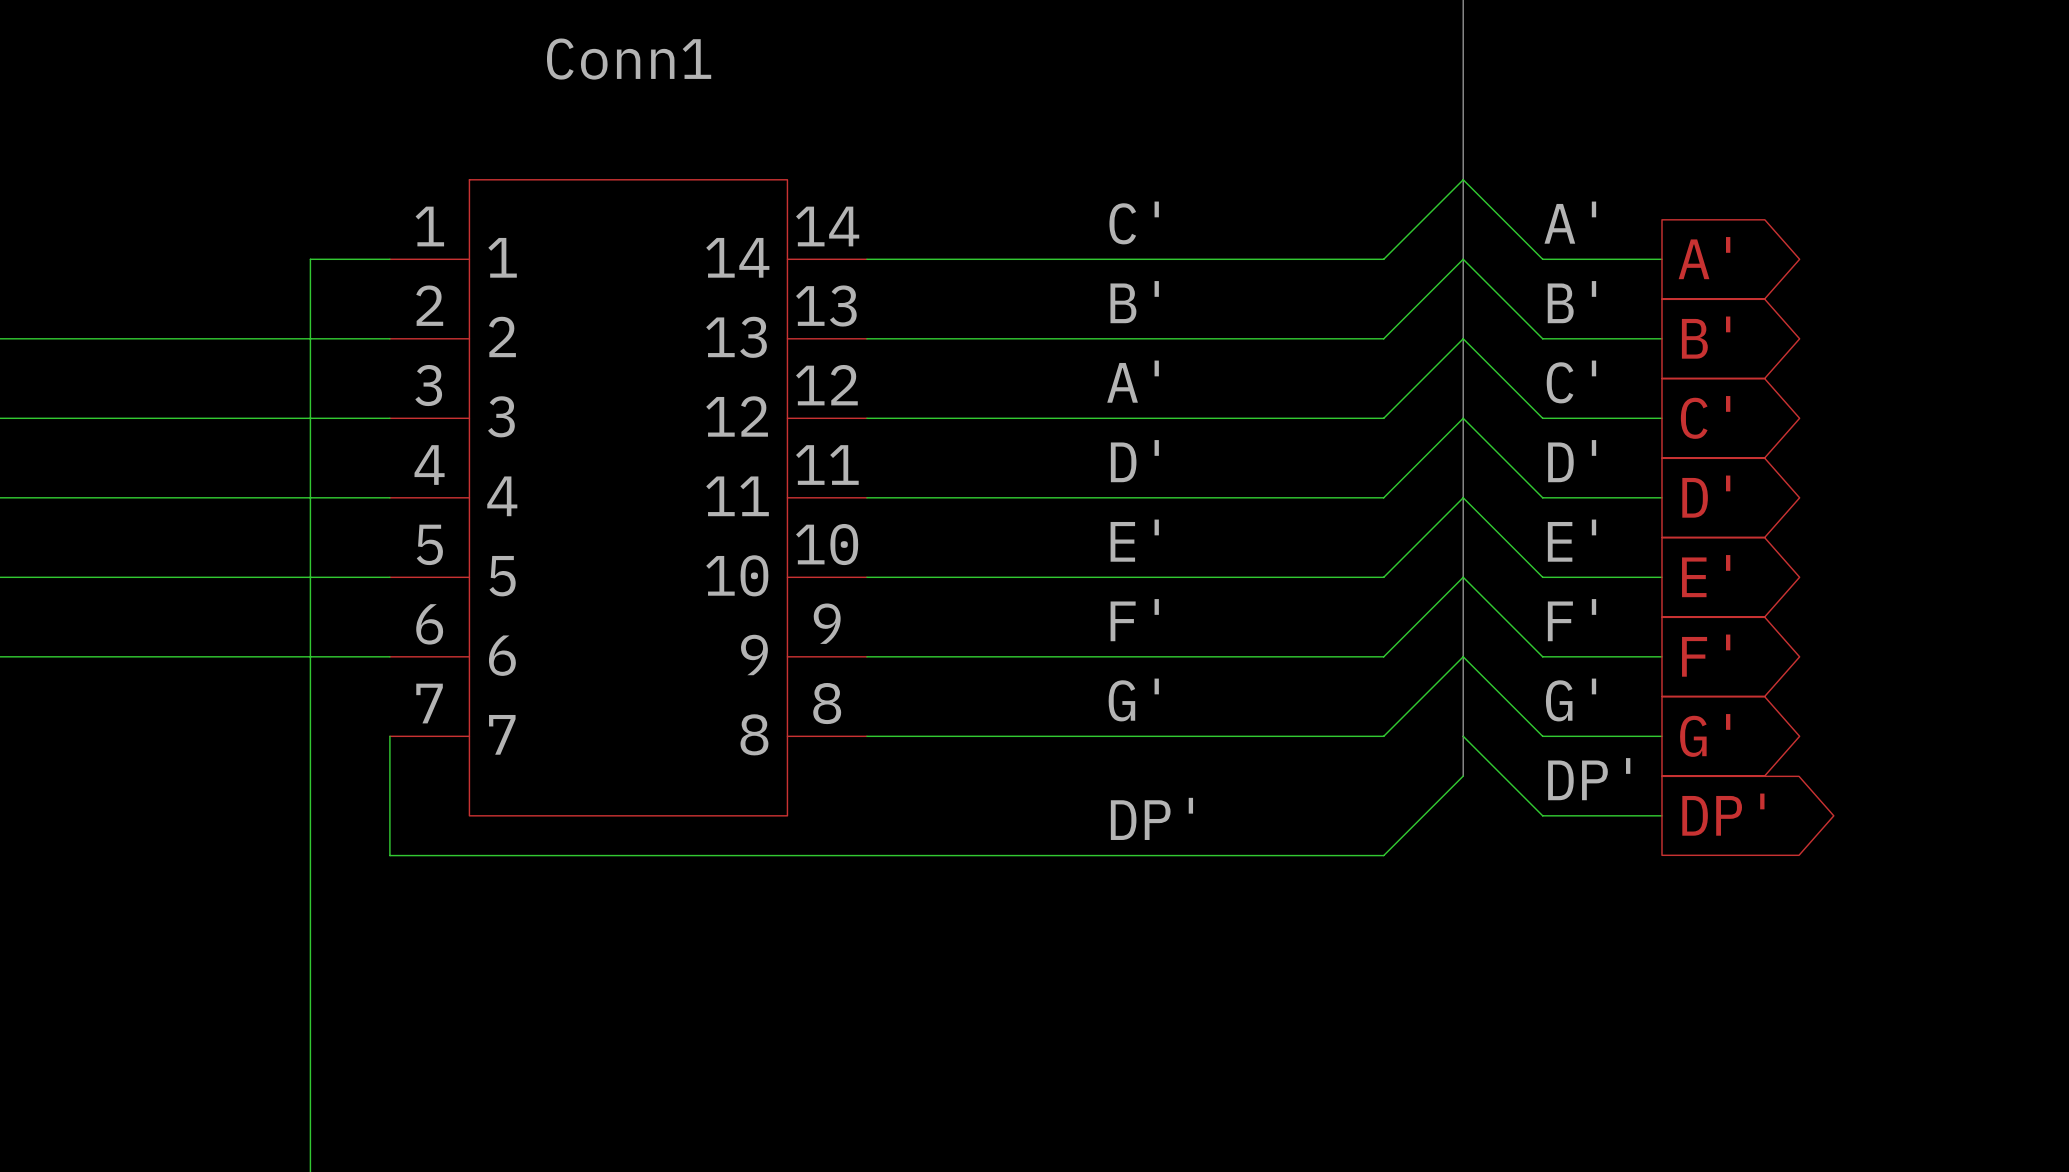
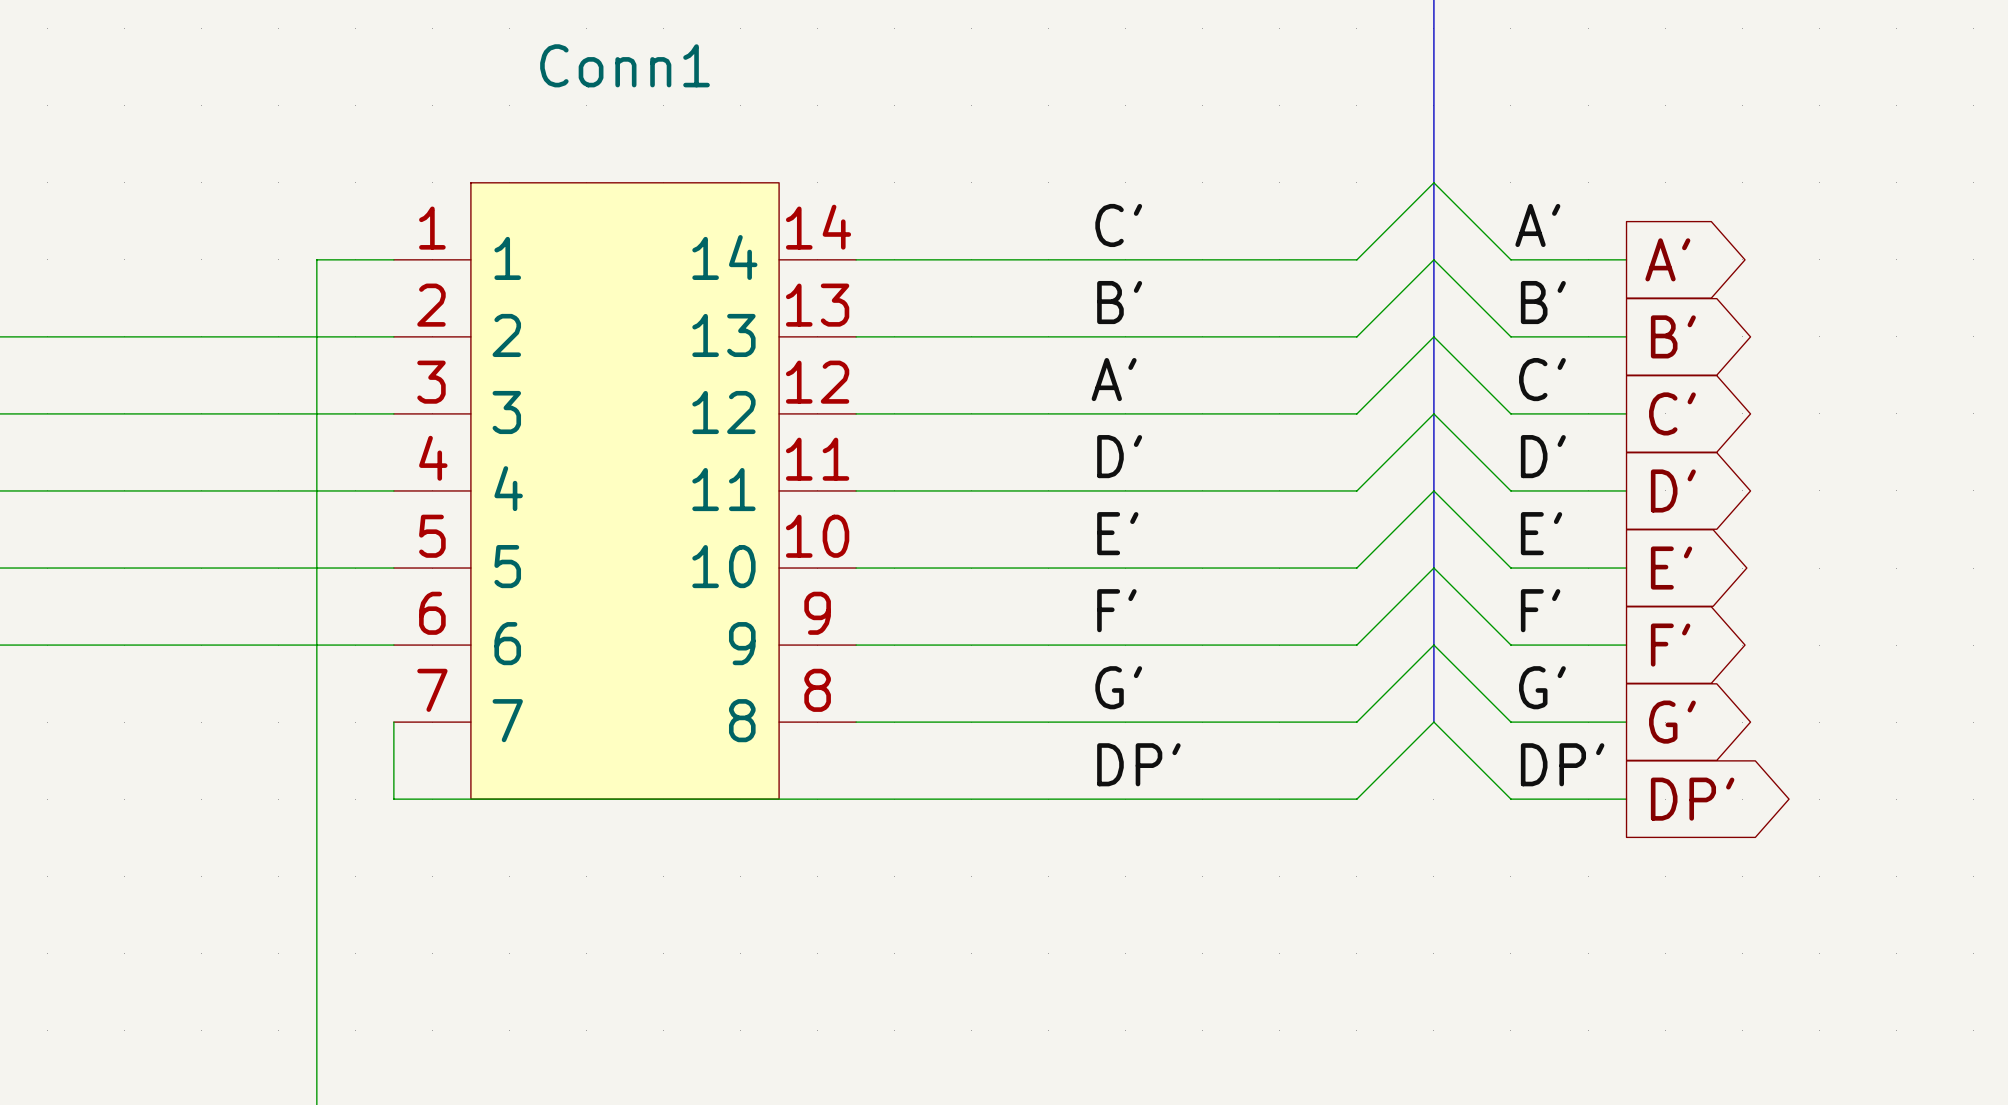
bus: (1463, 736) (1463, 776) -> none
wire: (1463, 776) (1383, 855) (389, 855) (389, 815) -> (1433, 722) (1356, 799) (393, 799)
label position: DP' (1151, 818) -> DP' (1138, 764)

